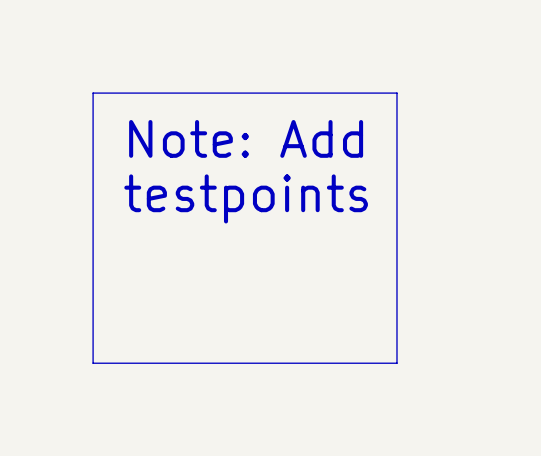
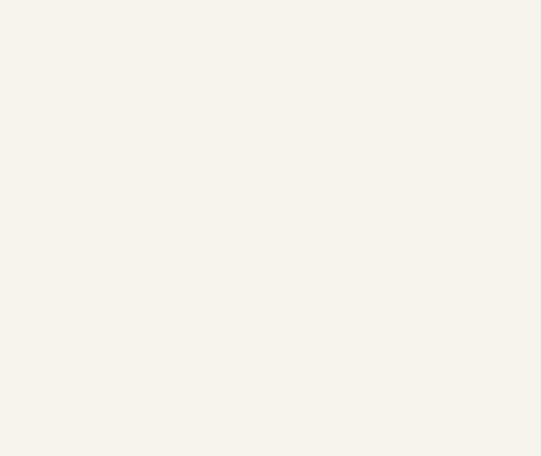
line: (93, 93) (396, 93) (396, 363) (93, 363) (93, 93) -> none
text: Note: Add (246, 138) -> none
text: testpoints (246, 198) -> none

